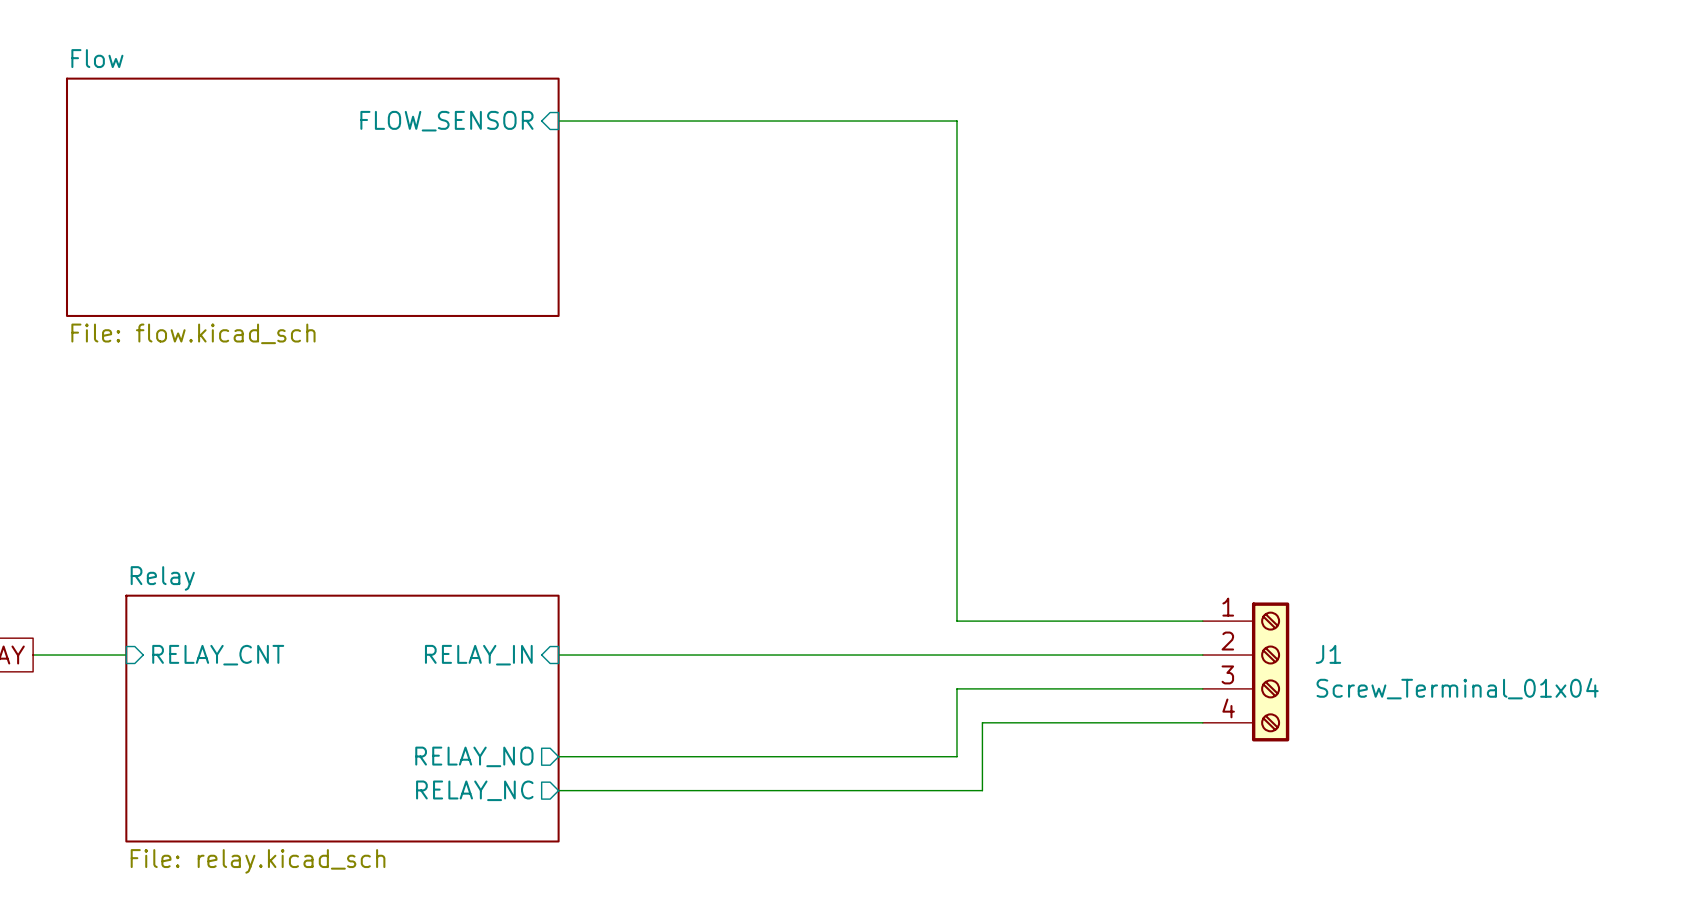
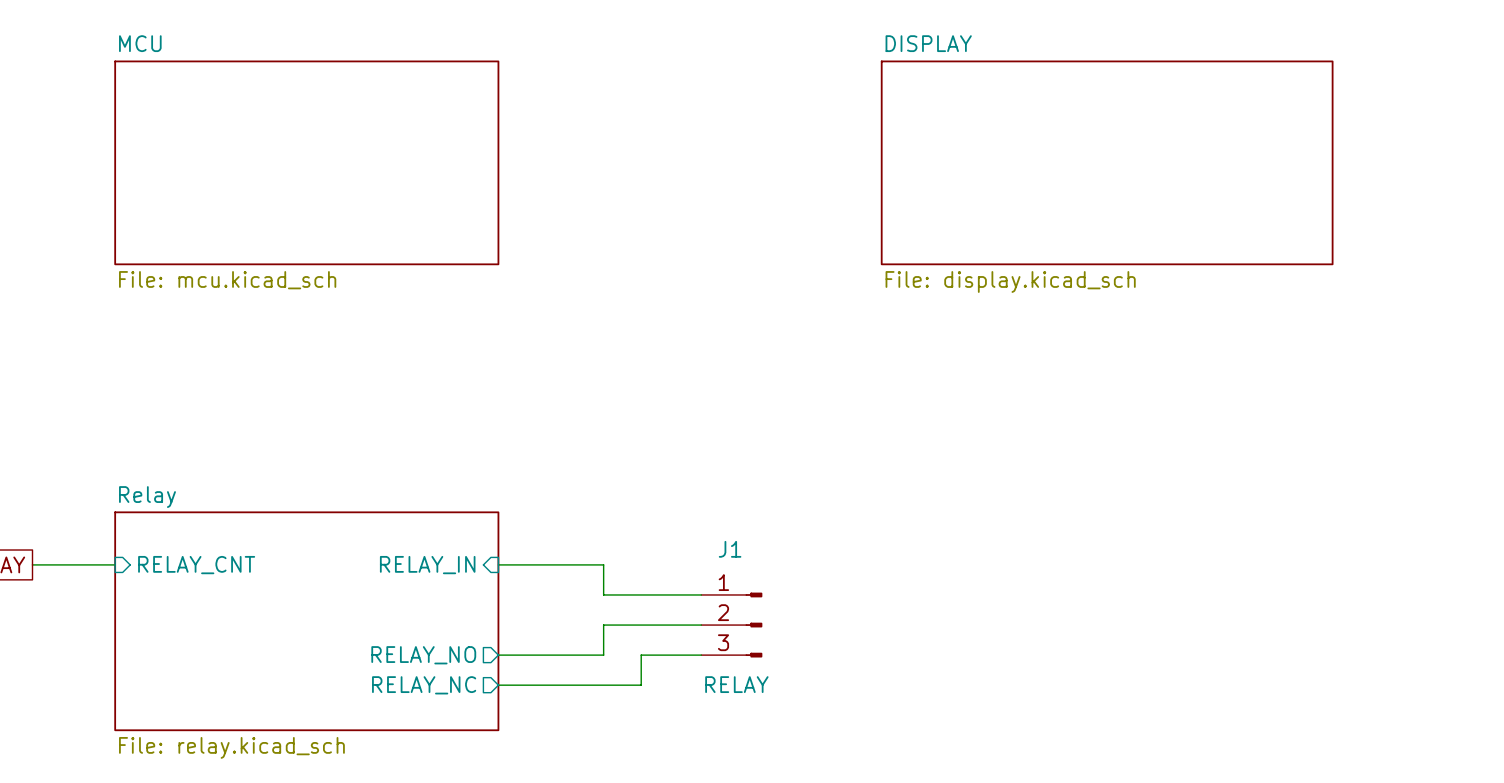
sheet pin: FLOW_SENSOR (446, 121) -> none
wire: (558, 121) (956, 121) (956, 621) (1202, 621) -> none
sheet Flow: File: flow.kicad_sch (312, 197) -> none
sheet MCU: none -> File: mcu.kicad_sch (306, 162)
sheet DISPLAY: none -> File: display.kicad_sch (1107, 162)
J1 symbol: [1202, 602, 1290, 742] -> [701, 592, 763, 658]
J1 name position: J1 (1328, 654) -> J1 (730, 549)
wire: (677, 655) (1202, 655) -> (603, 564) (603, 594) (701, 594)
wire: (1202, 688) (956, 688) (956, 756) (787, 756) -> none
J1 value: Screw_Terminal_01x04 (1457, 688) -> RELAY (736, 684)
wire: none -> (701, 625) (603, 625) (603, 655)
wire: (1202, 722) (982, 722) (982, 790) (719, 790) -> none
wire: (677, 756) (719, 756) -> (641, 685) (641, 655)

